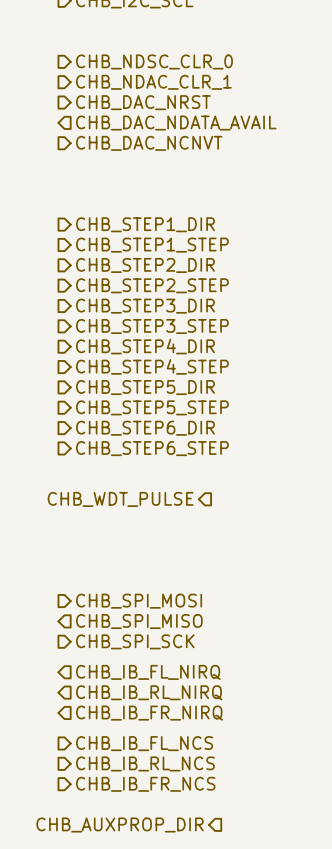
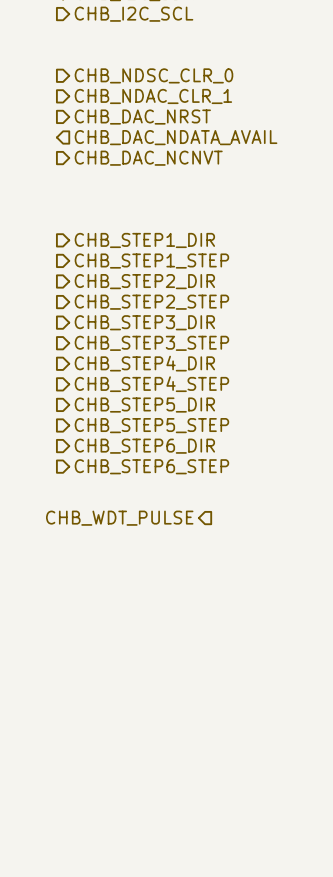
hierarchical label: CHB_SPI_MOSI (139, 601) -> none
hierarchical label: CHB_SPI_MISO (139, 621) -> none
hierarchical label: CHB_SPI_SCK (135, 641) -> none
hierarchical label: CHB_IB_FL_NIRQ (148, 672) -> none
hierarchical label: CHB_IB_RL_NIRQ (149, 692) -> none
hierarchical label: CHB_IB_FR_NIRQ (149, 713) -> none
hierarchical label: CHB_IB_FL_NCS (144, 743) -> none
hierarchical label: CHB_IB_RL_NCS (145, 763) -> none
hierarchical label: CHB_IB_FR_NCS (145, 784) -> none
hierarchical label: CHB_AUXPROP_DIR (120, 824) -> none

